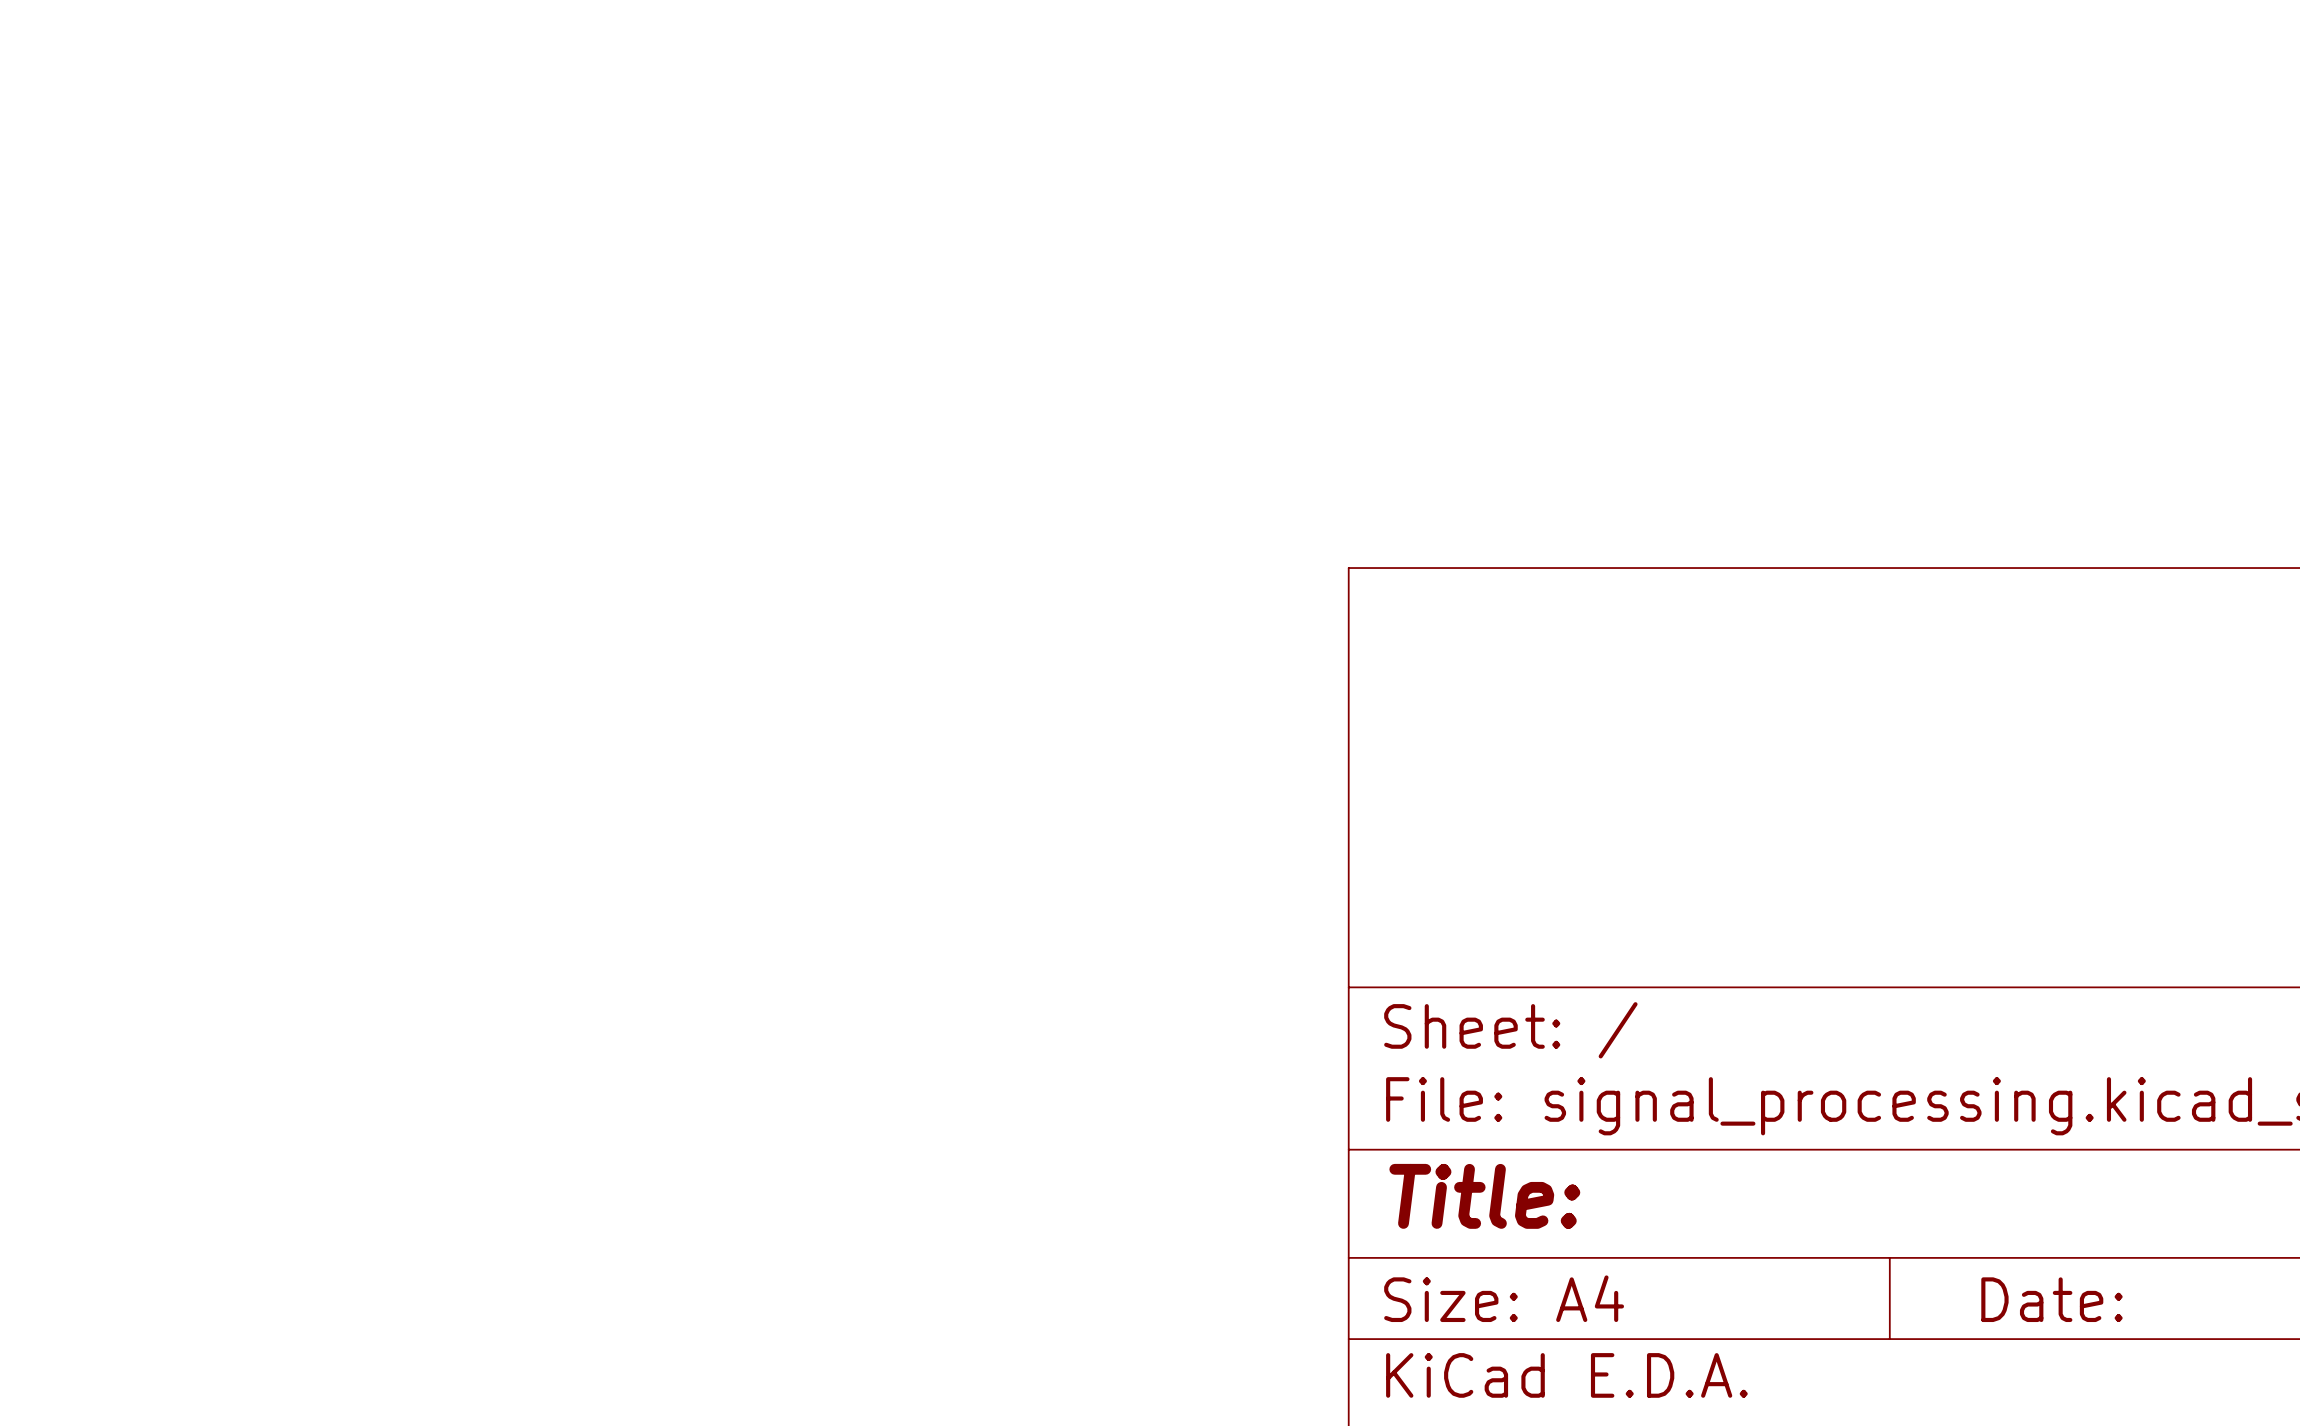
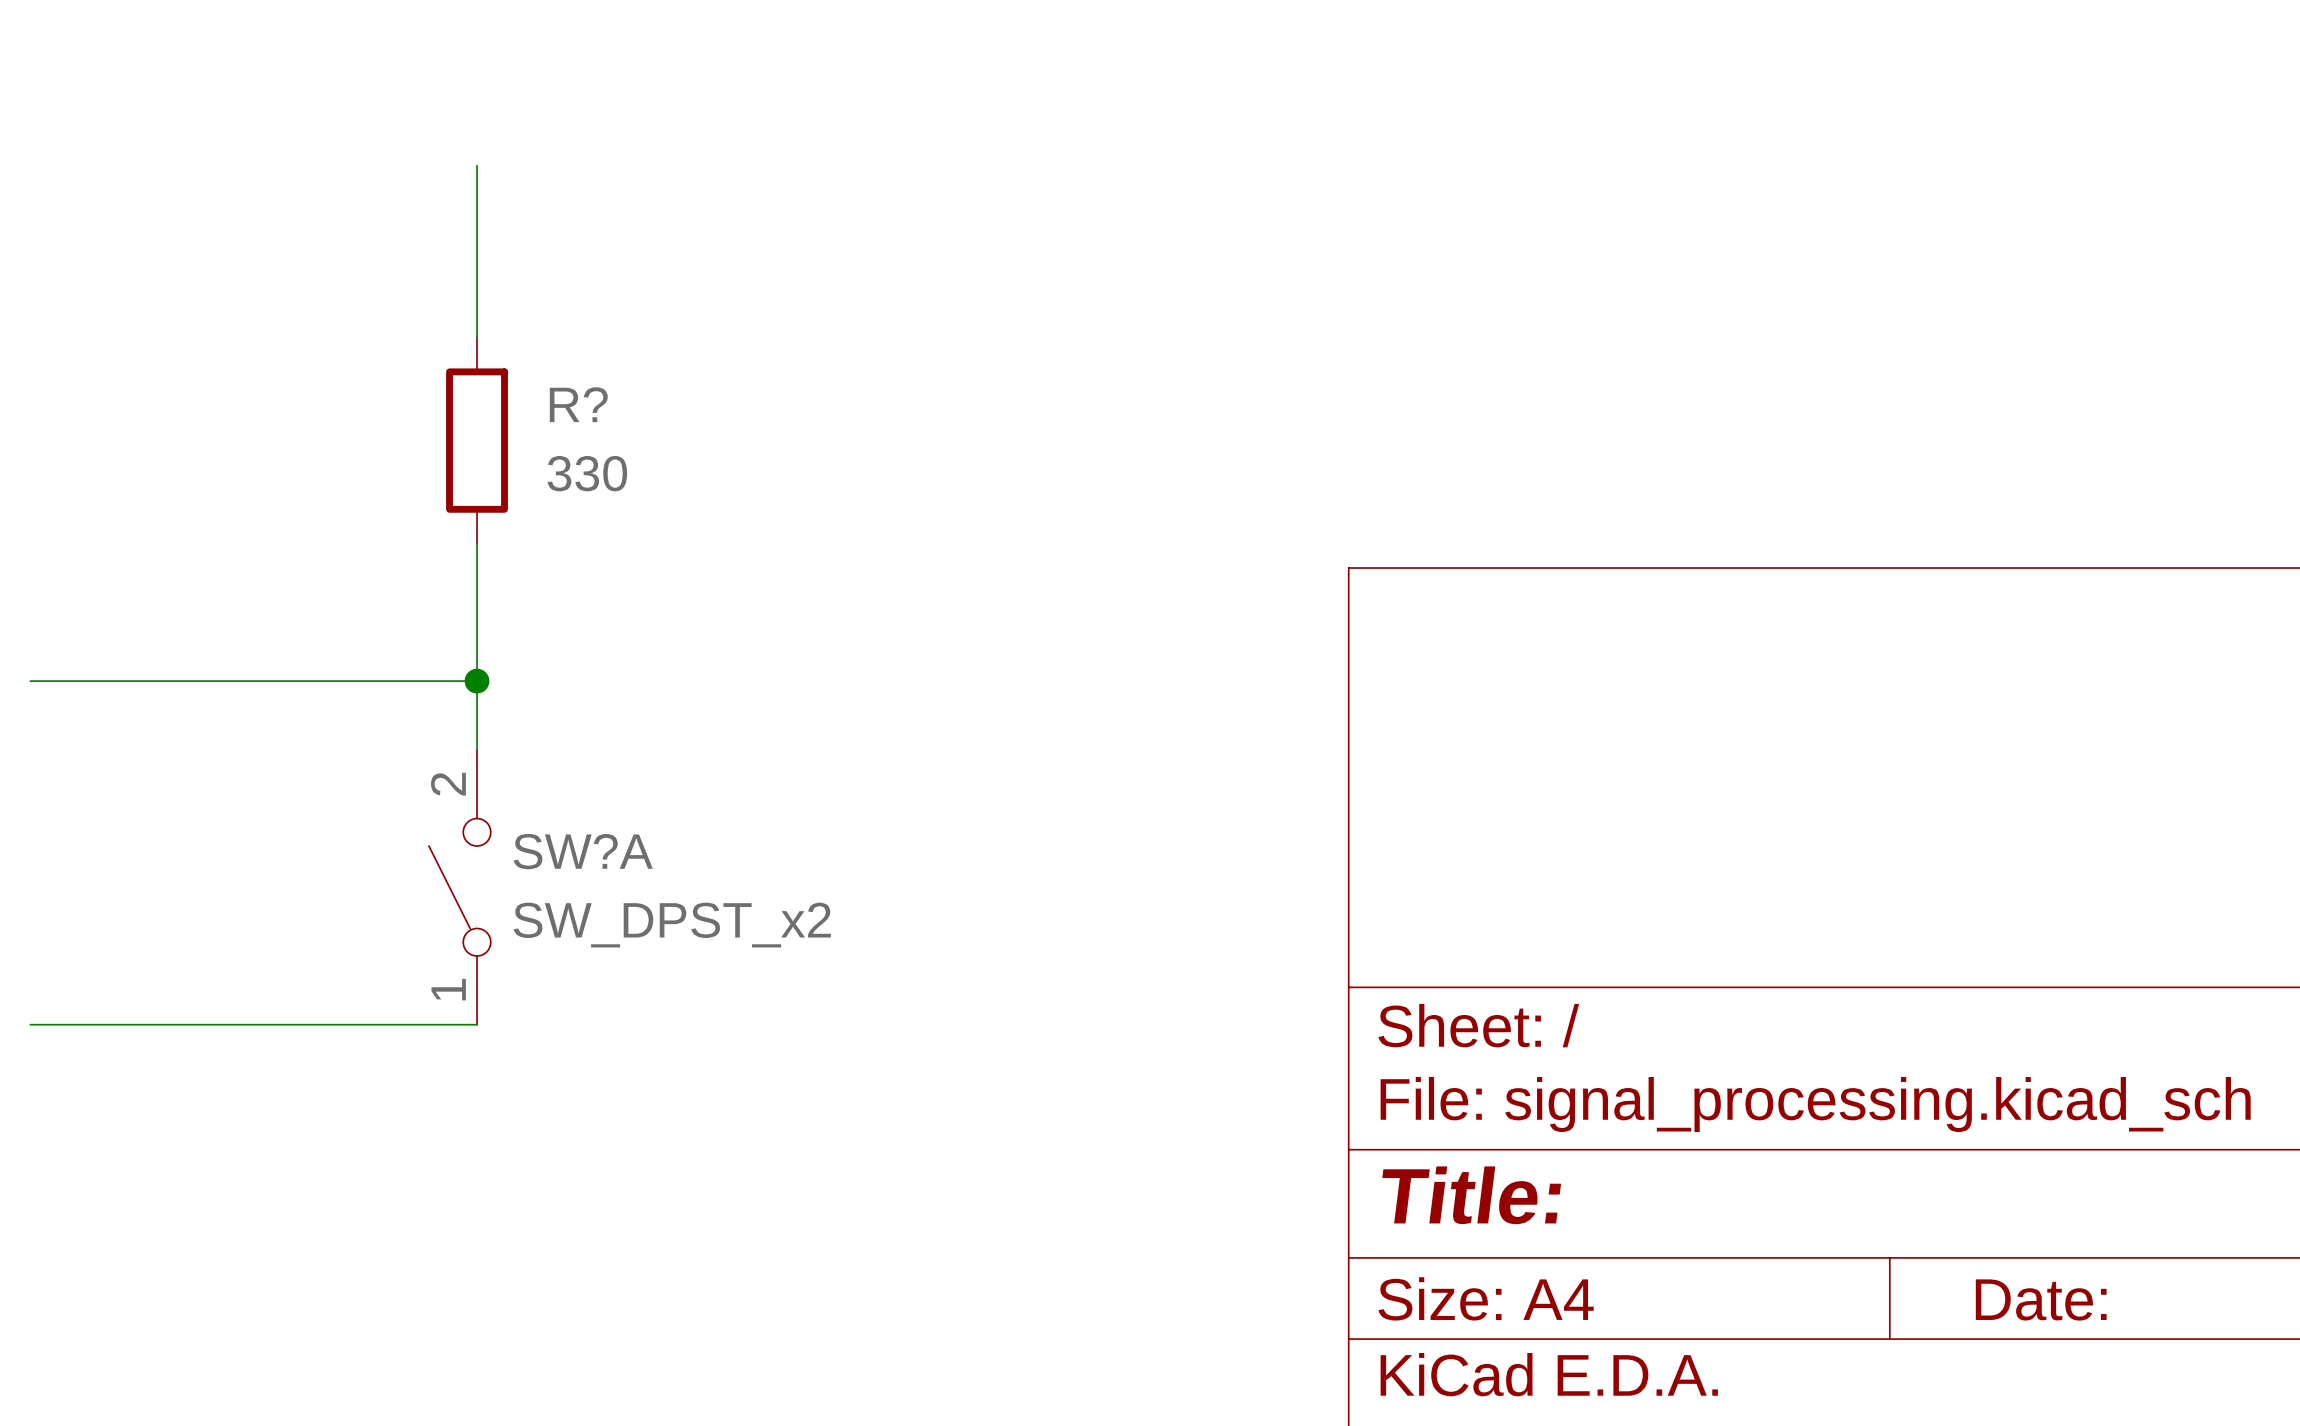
wire: none -> (477, 165) (477, 337)
R?: none -> 330 (477, 440)
wire: none -> (477, 543) (477, 749)
wire: none -> (30, 681) (477, 681)
junction: none -> (477, 681)
SW?A: none -> SW_DPST_x2 (459, 887)
wire: none -> (30, 1024) (477, 1024)

